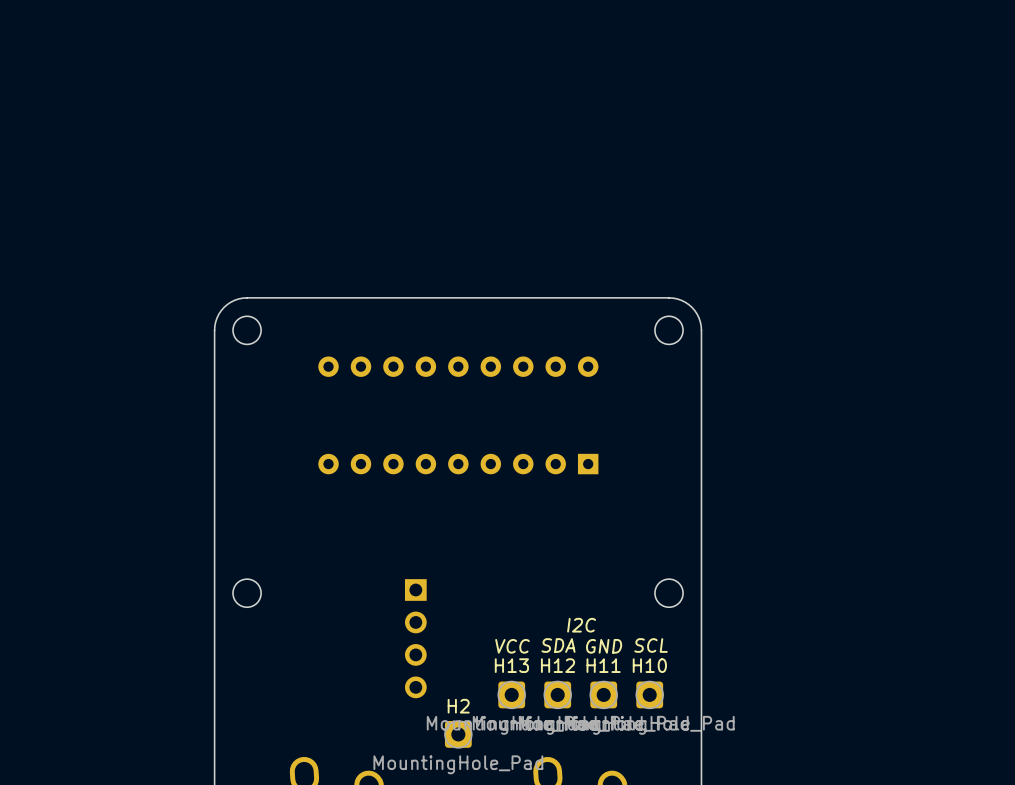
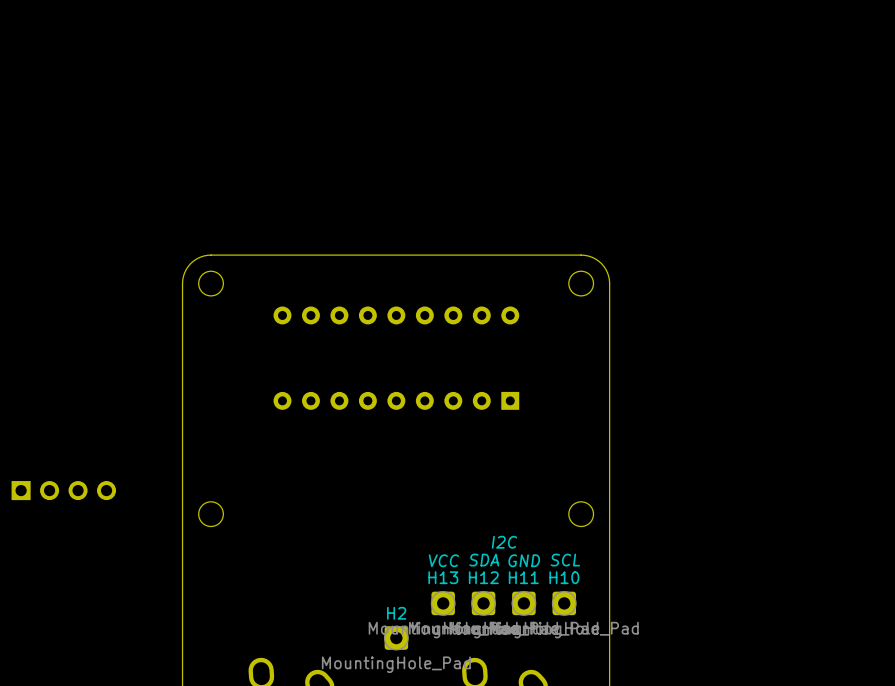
part: none -> (63, 490)
part: (415, 638) -> none

